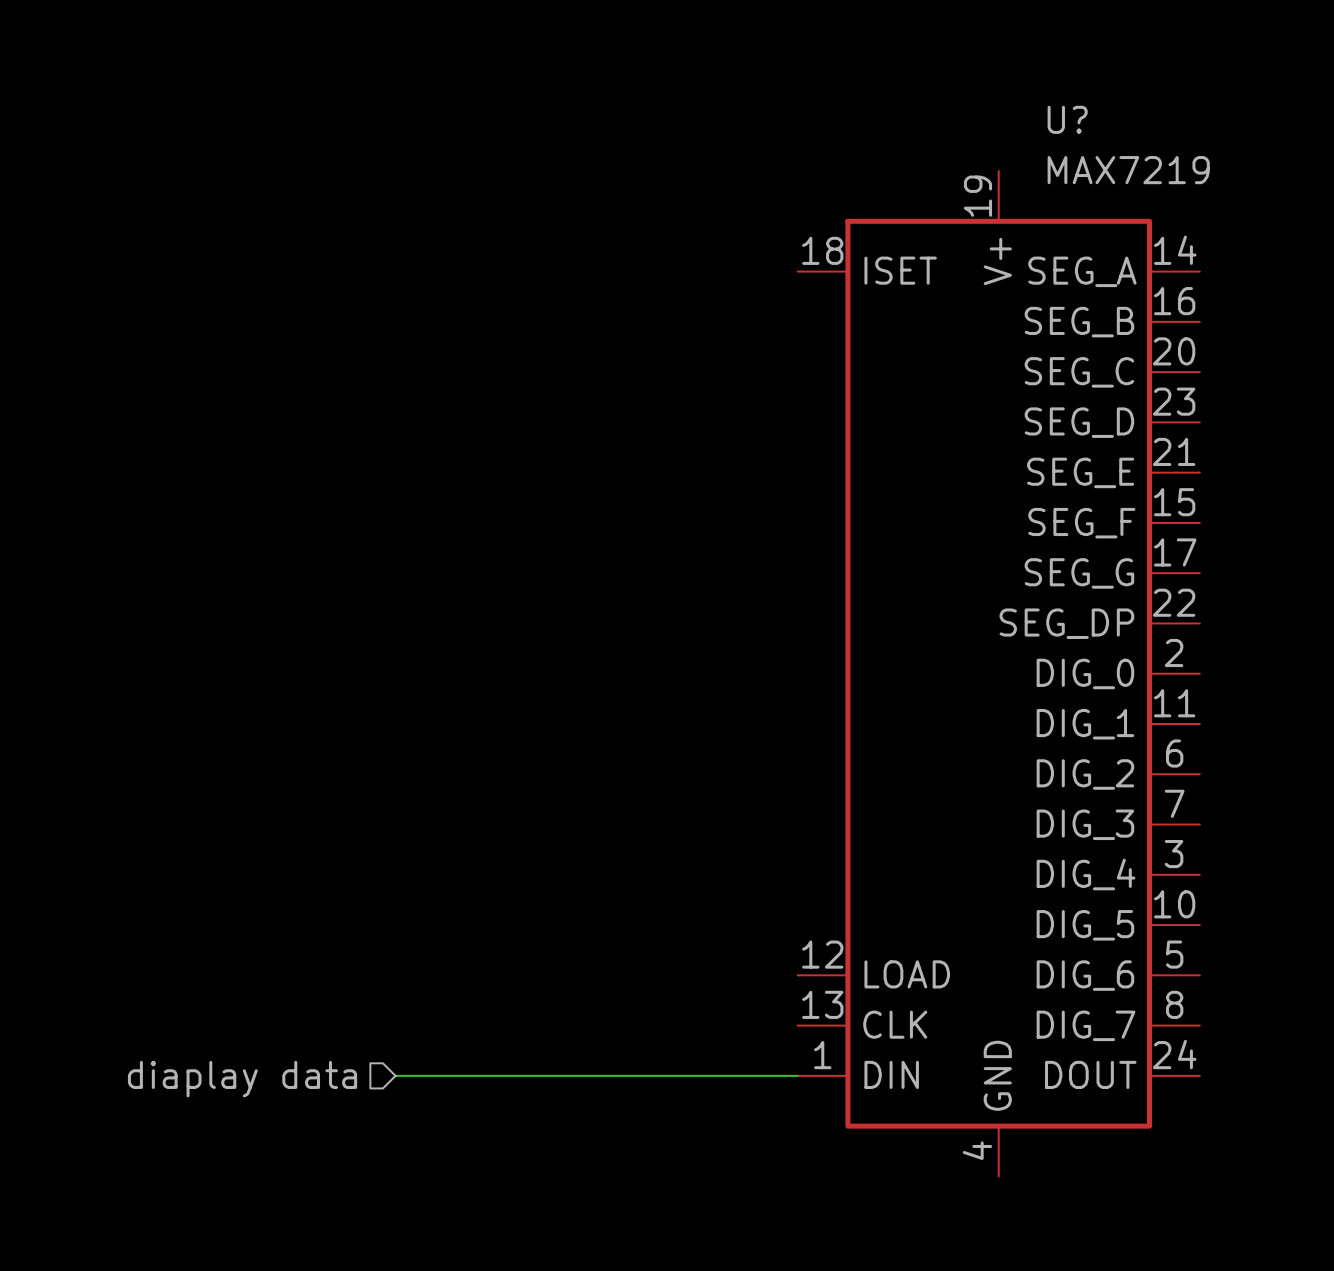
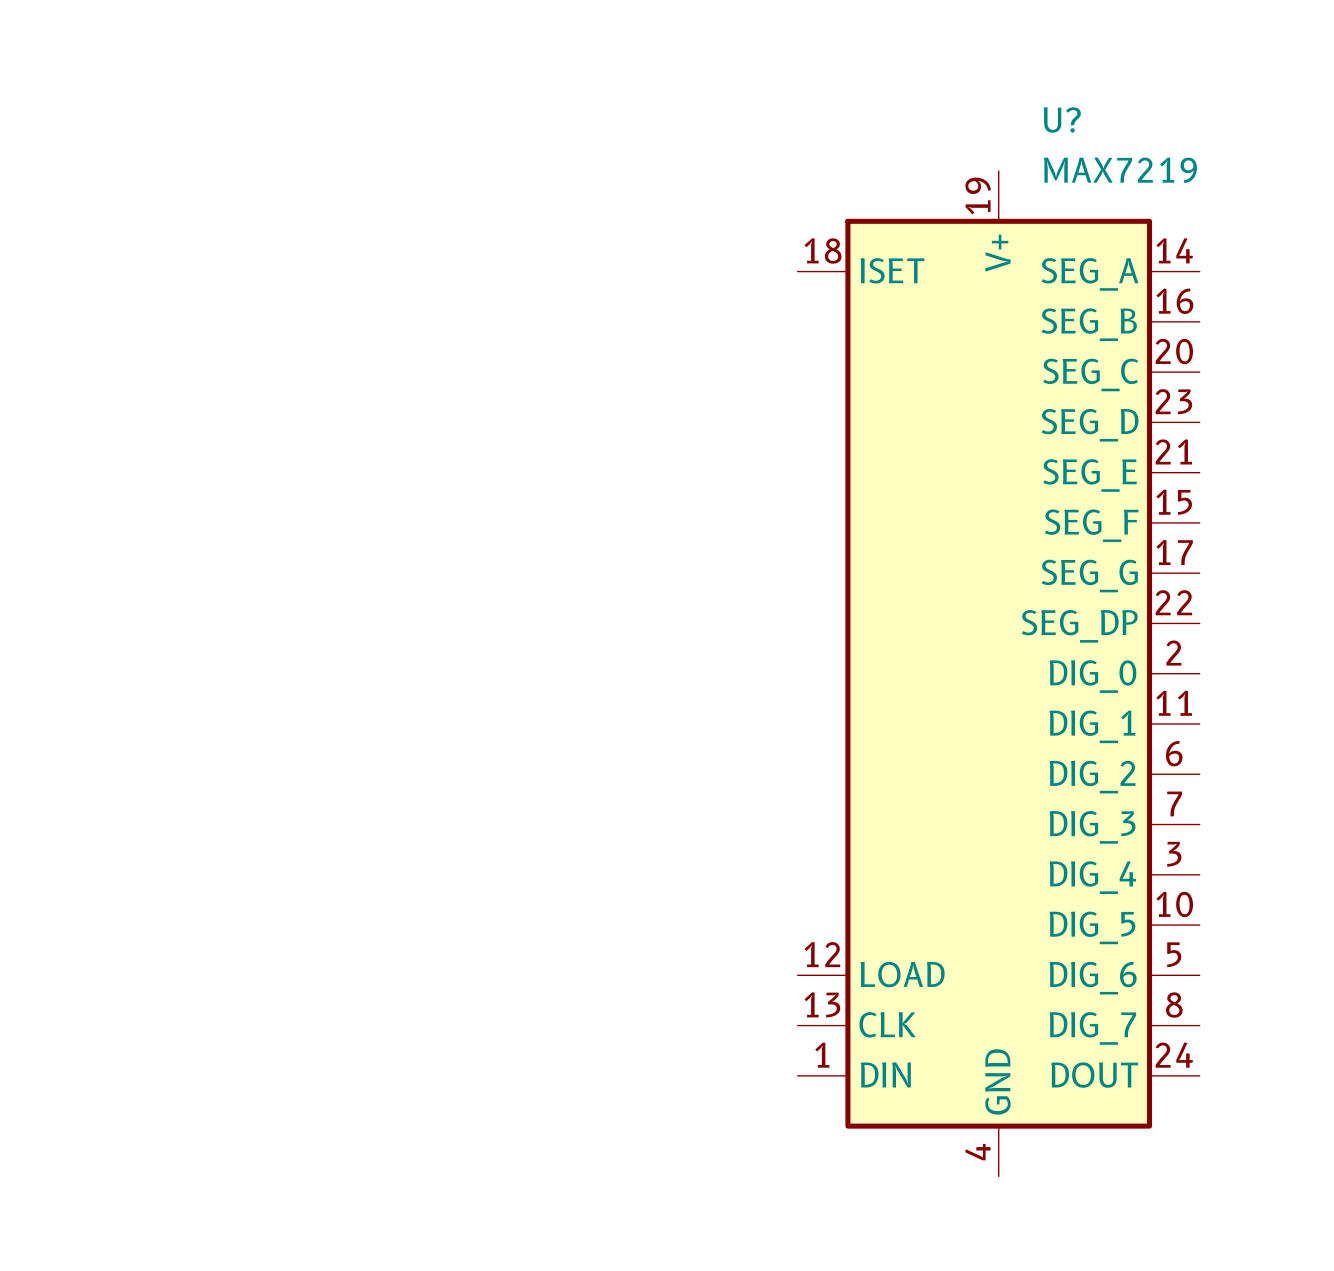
wire: (395, 1075) (797, 1075) -> none
hierarchical label: diaplay data (242, 1079) -> none

